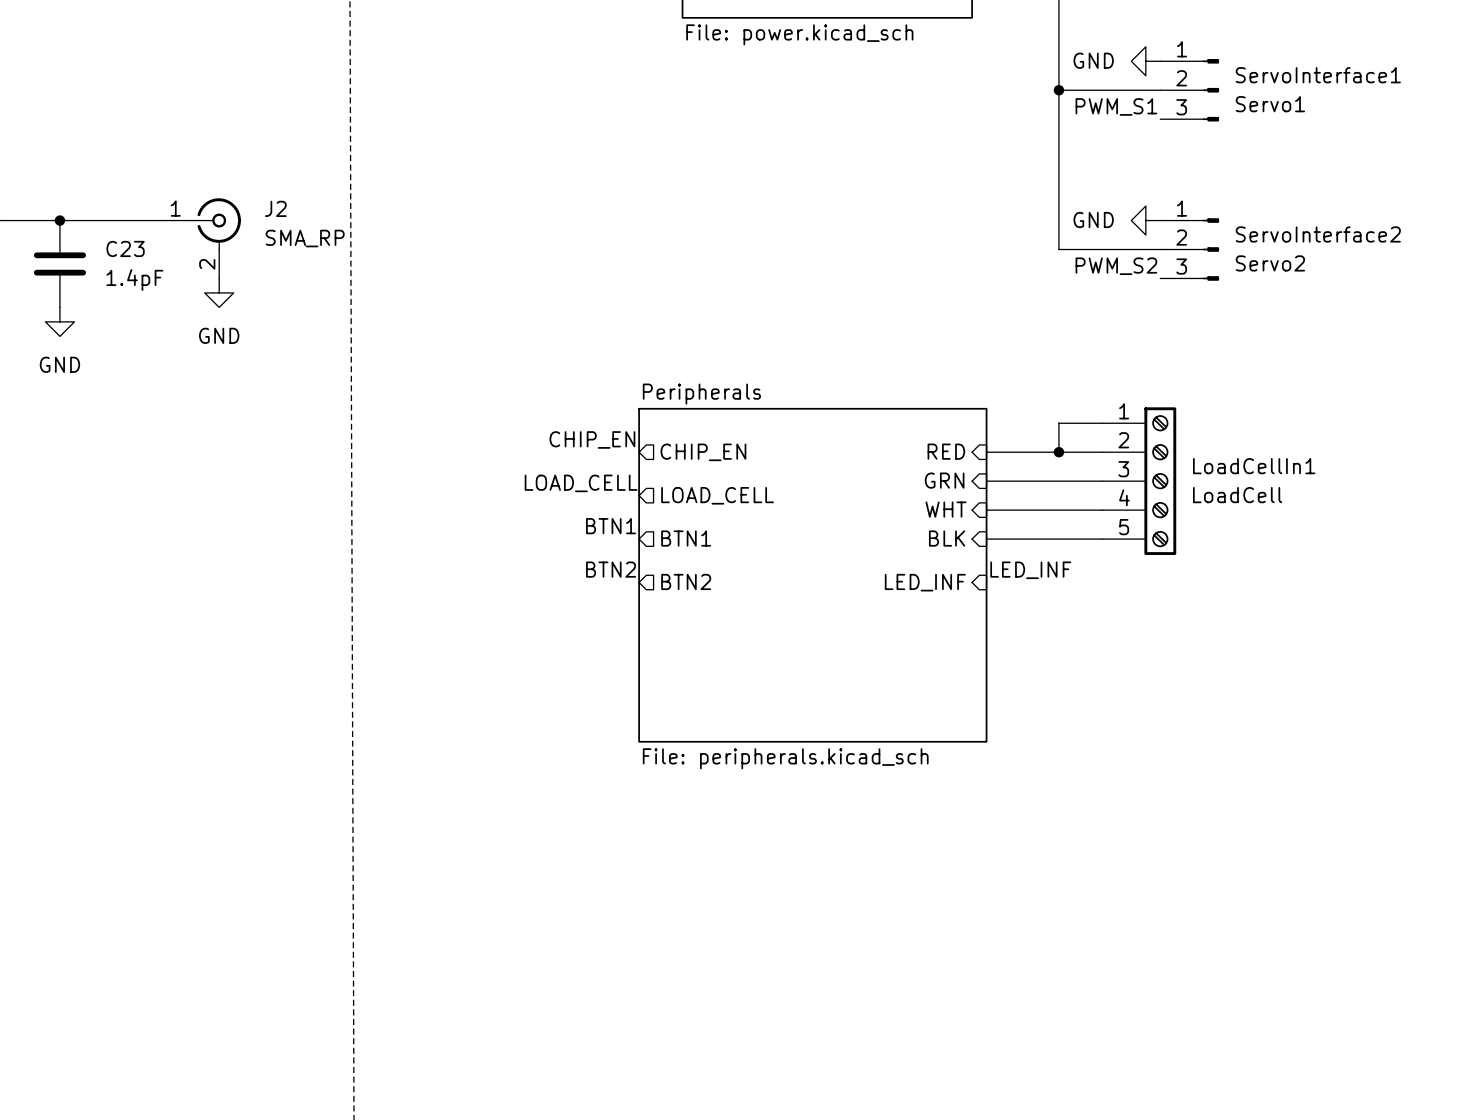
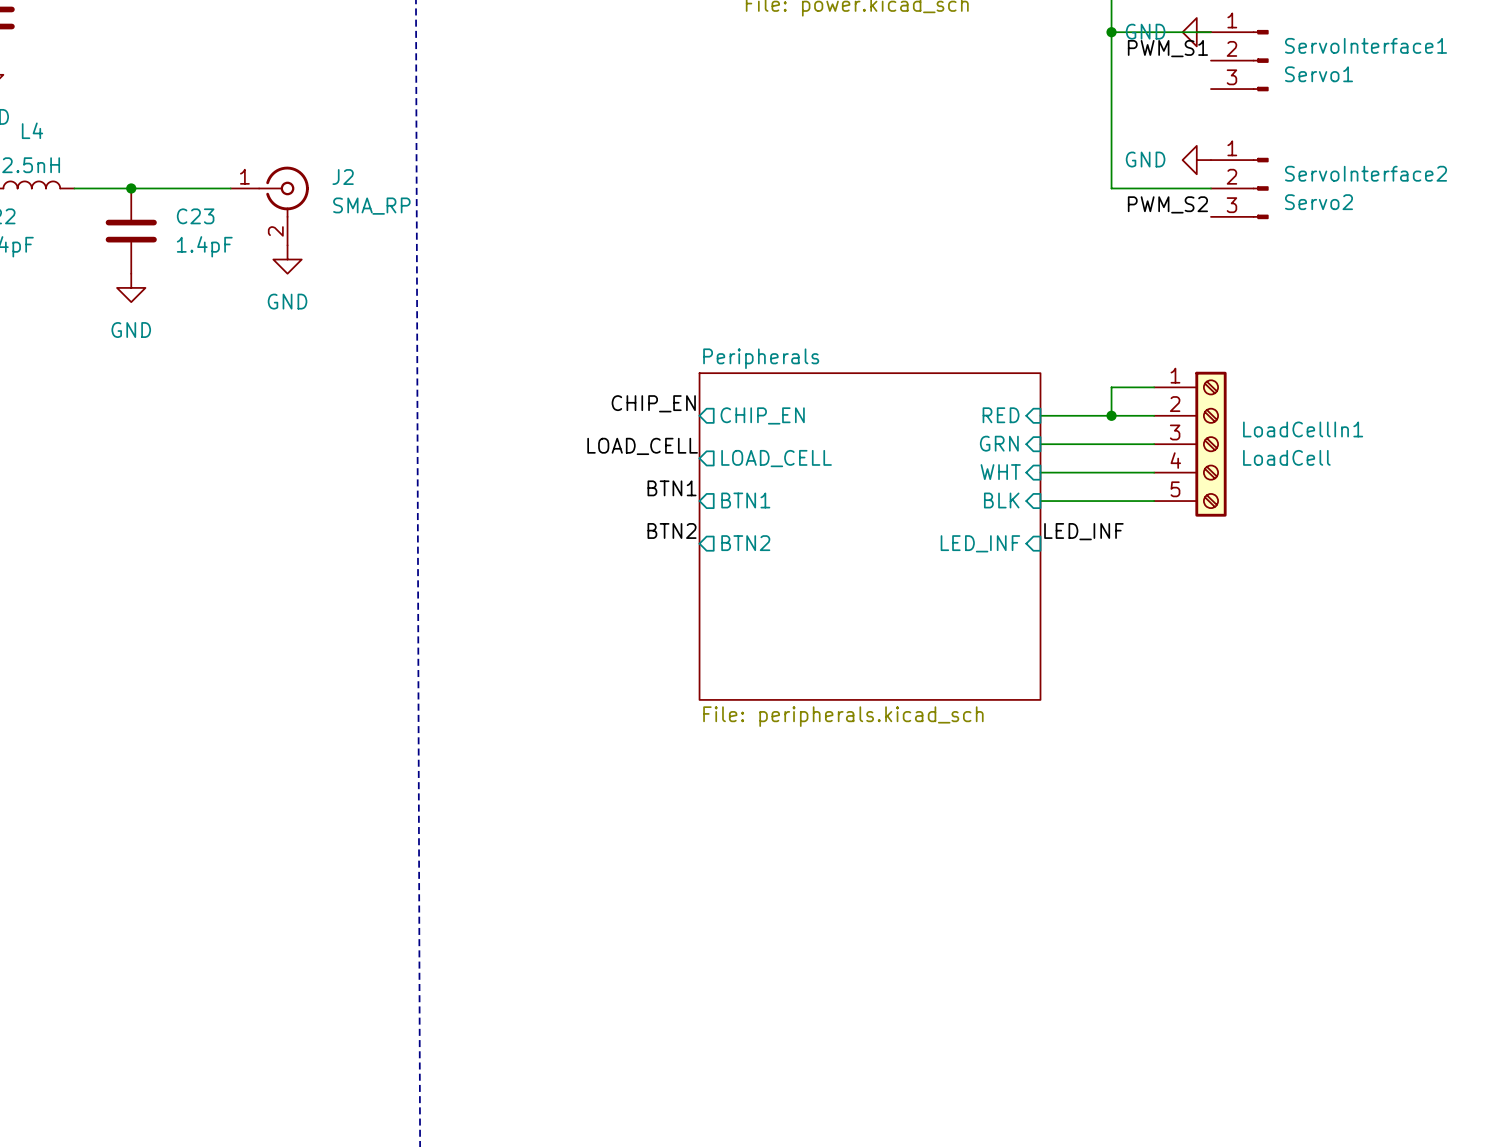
wire: (1058, 90) (1160, 90) -> (1111, 32) (1210, 32)
junction position: (1058, 90) -> (1111, 32)
label position: PWM_S1 (1116, 106) -> PWM_S1 (1167, 48)
wire: (1058, 220) (1058, 249) (1160, 249) -> (1111, 188) (1210, 188)
power symbol position: GND (1145, 220) -> GND (1196, 160)
ServoInterface2 position: (1189, 249) -> (1239, 188)
label position: PWM_S2 (1116, 266) -> PWM_S2 (1167, 204)

